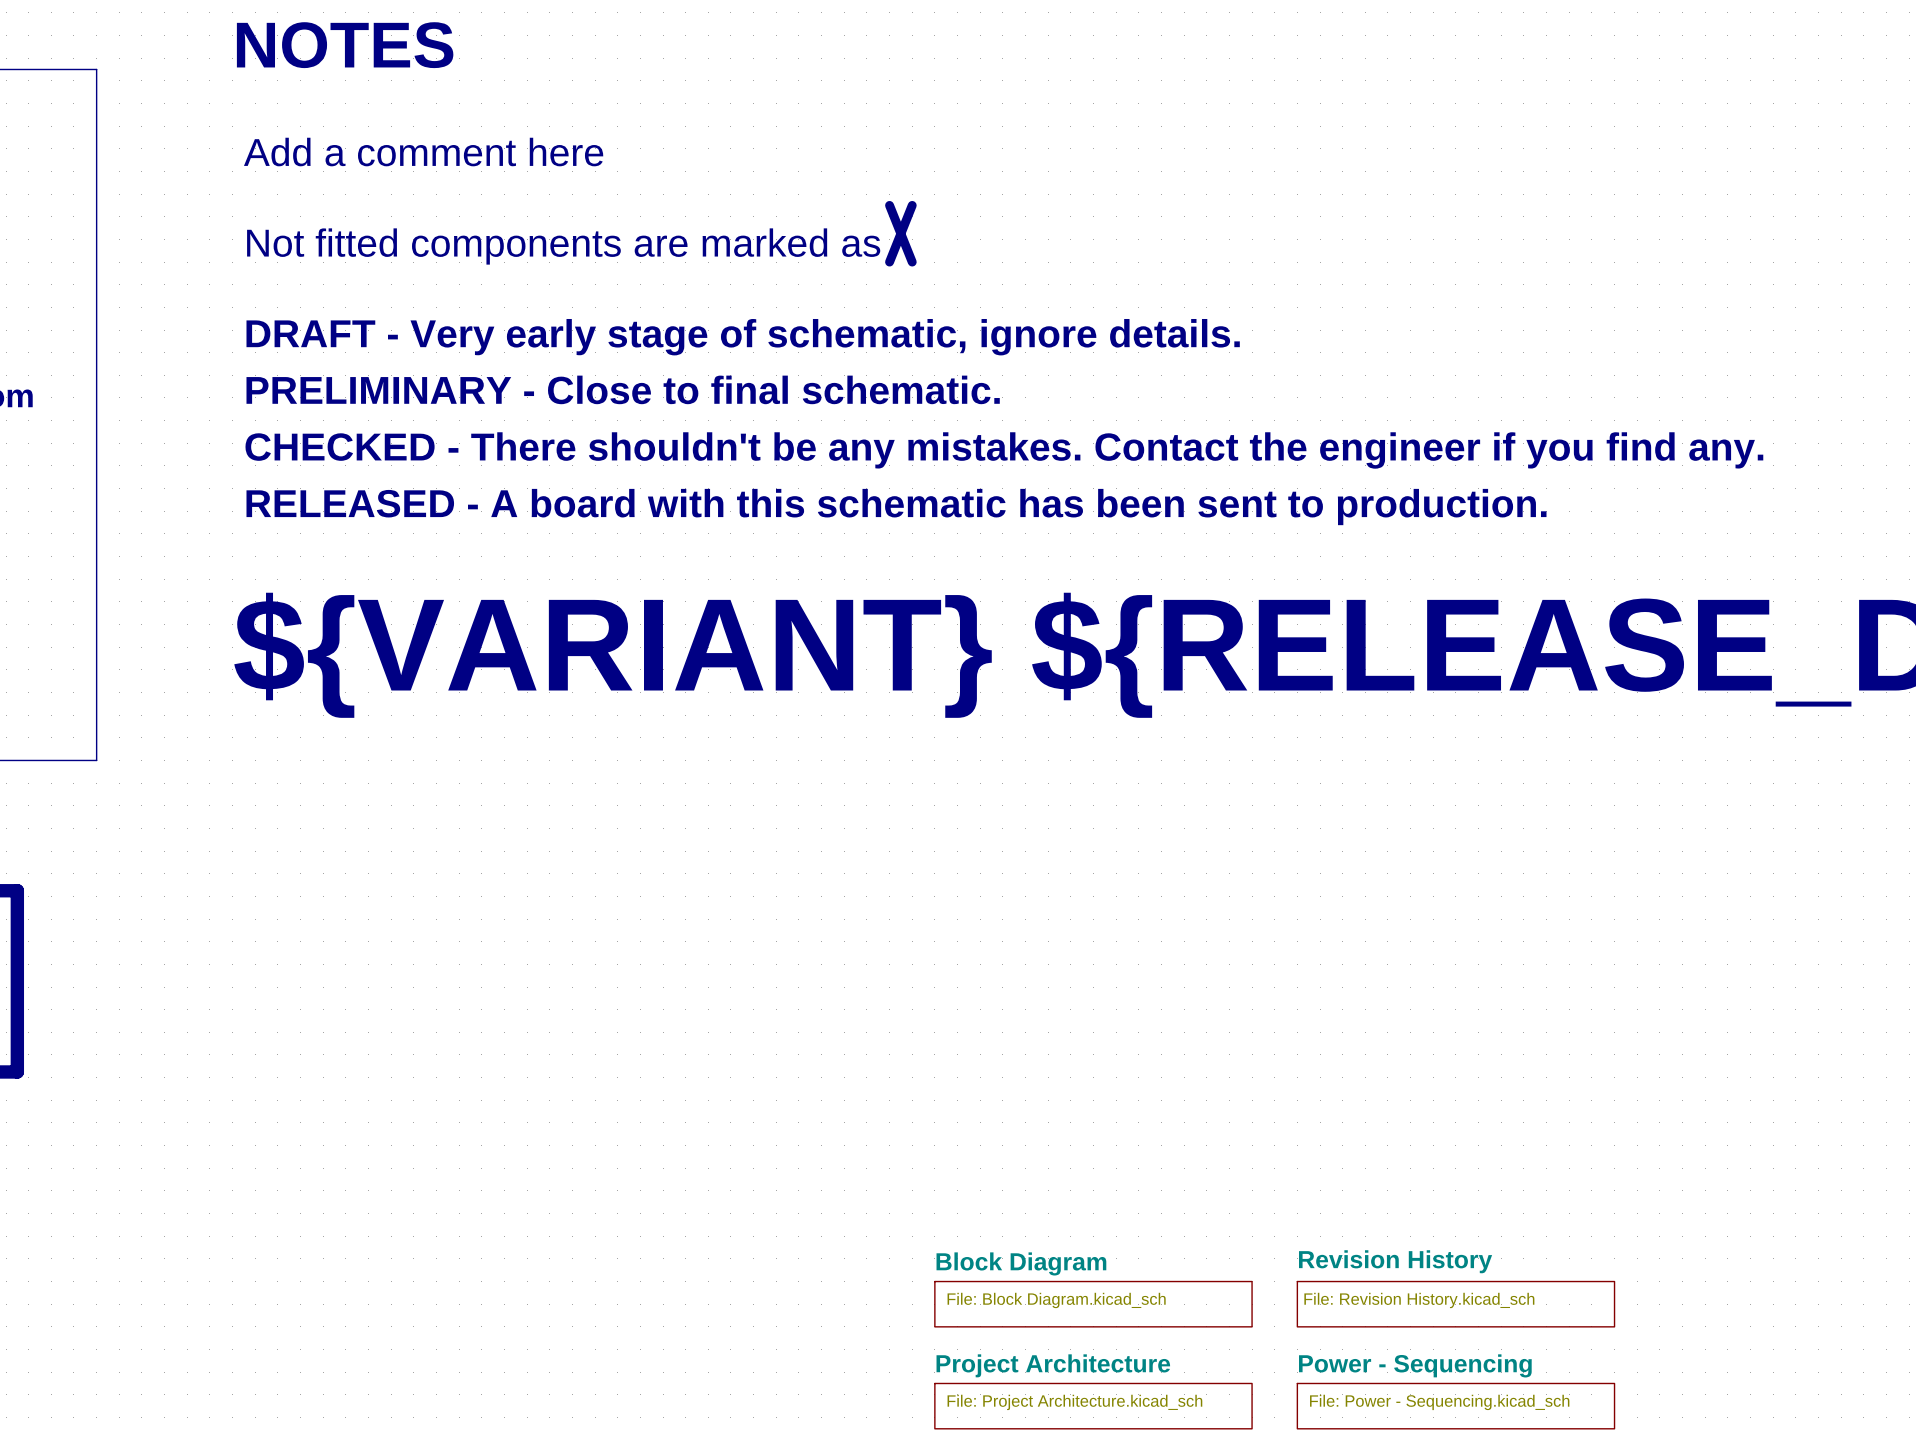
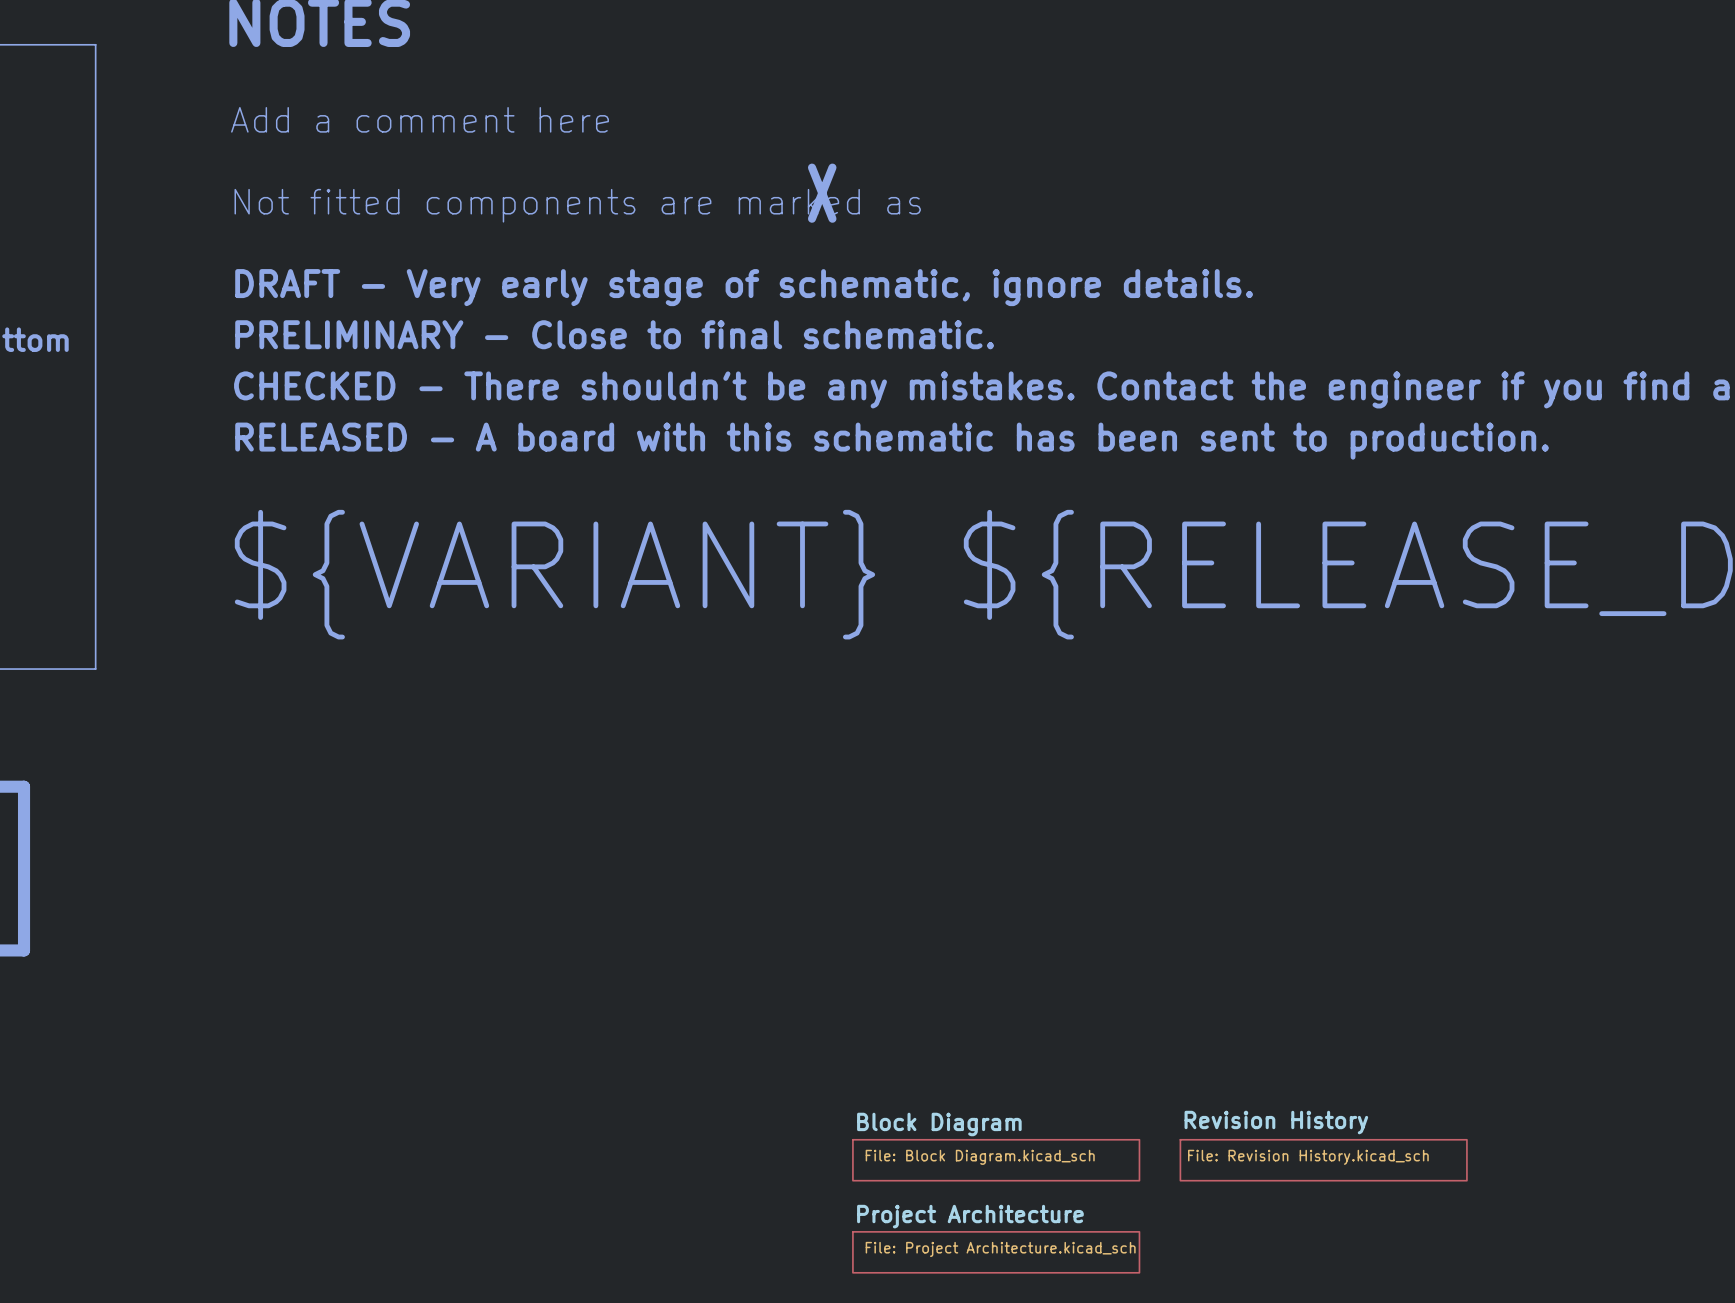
sheet Power - Sequencing: File: Power - Sequencing.kicad_sch (1455, 1406) -> none

